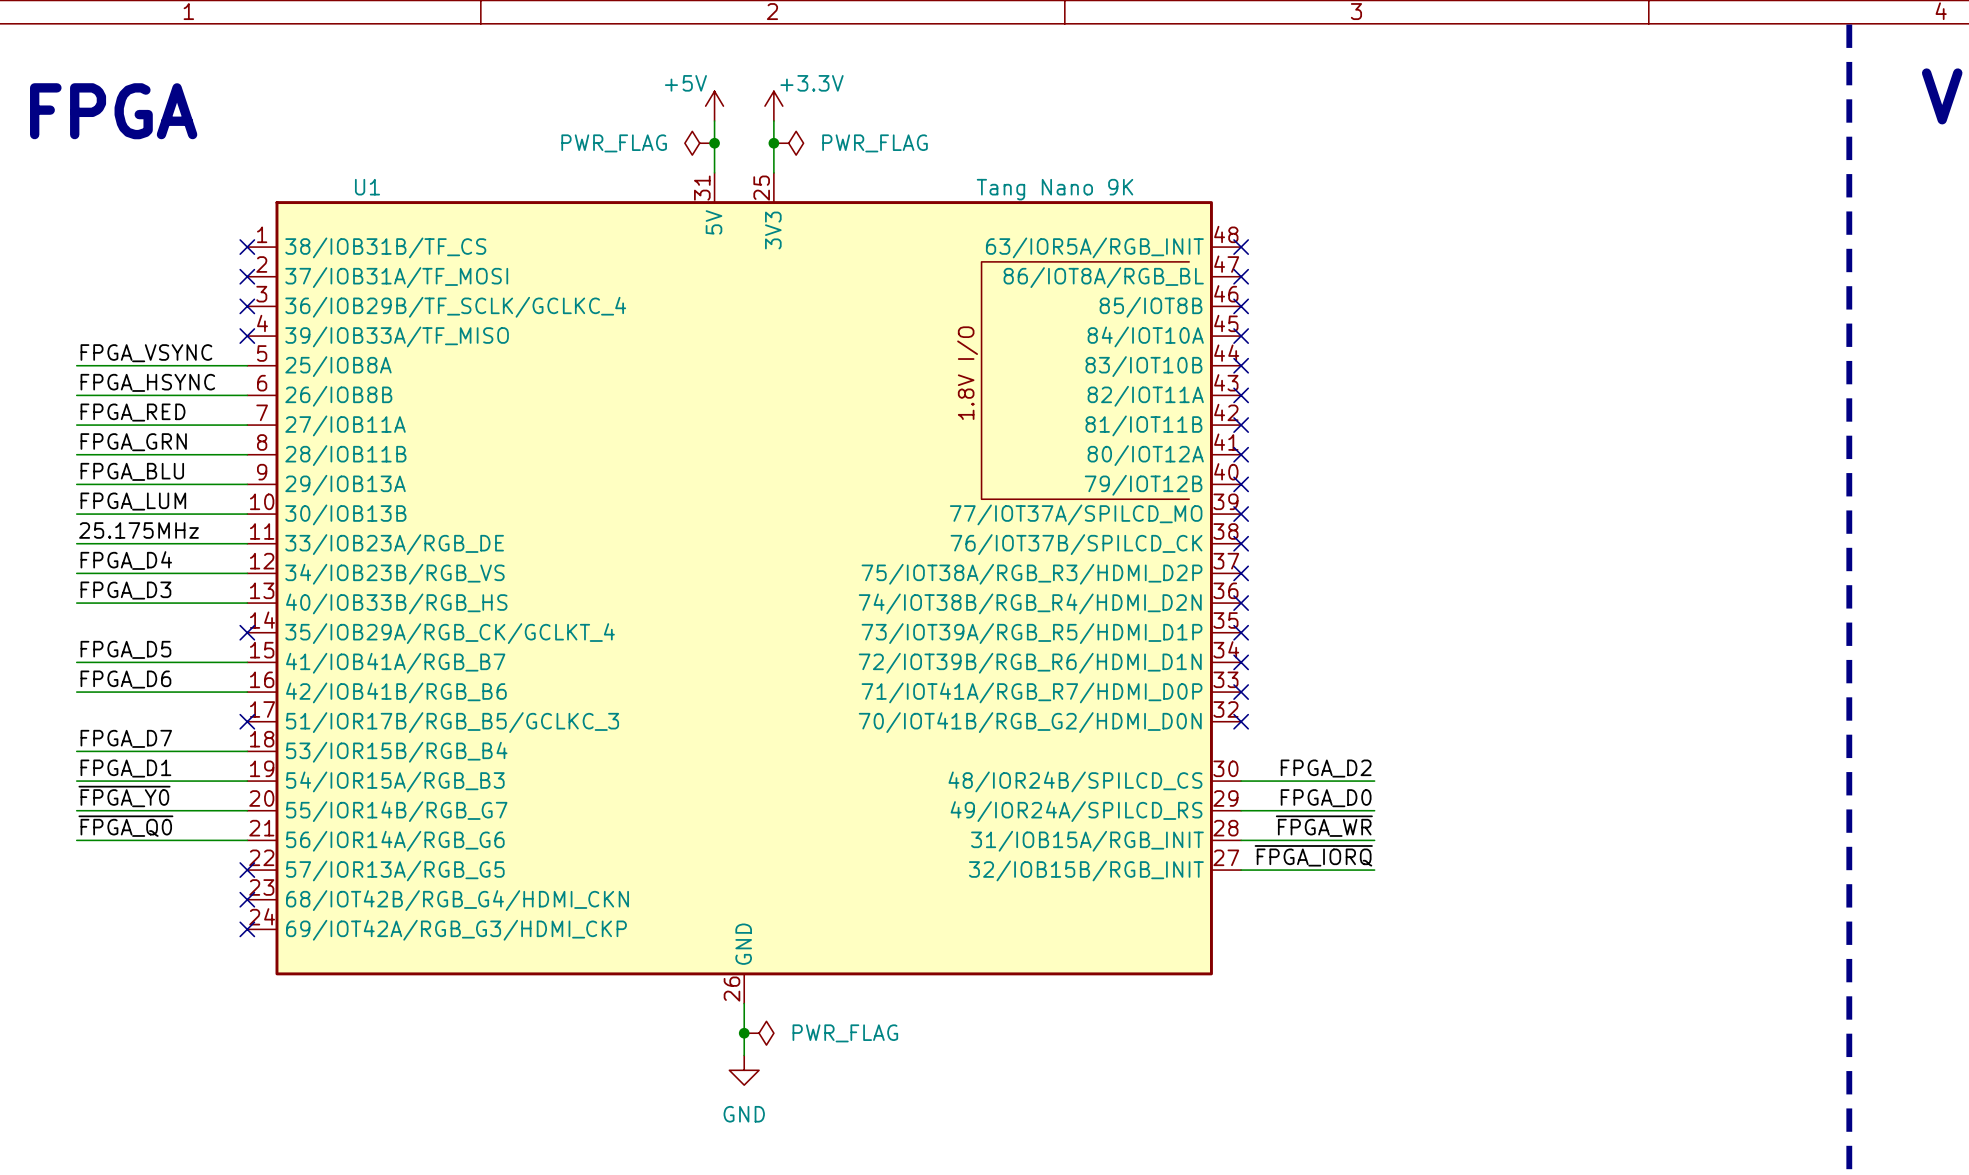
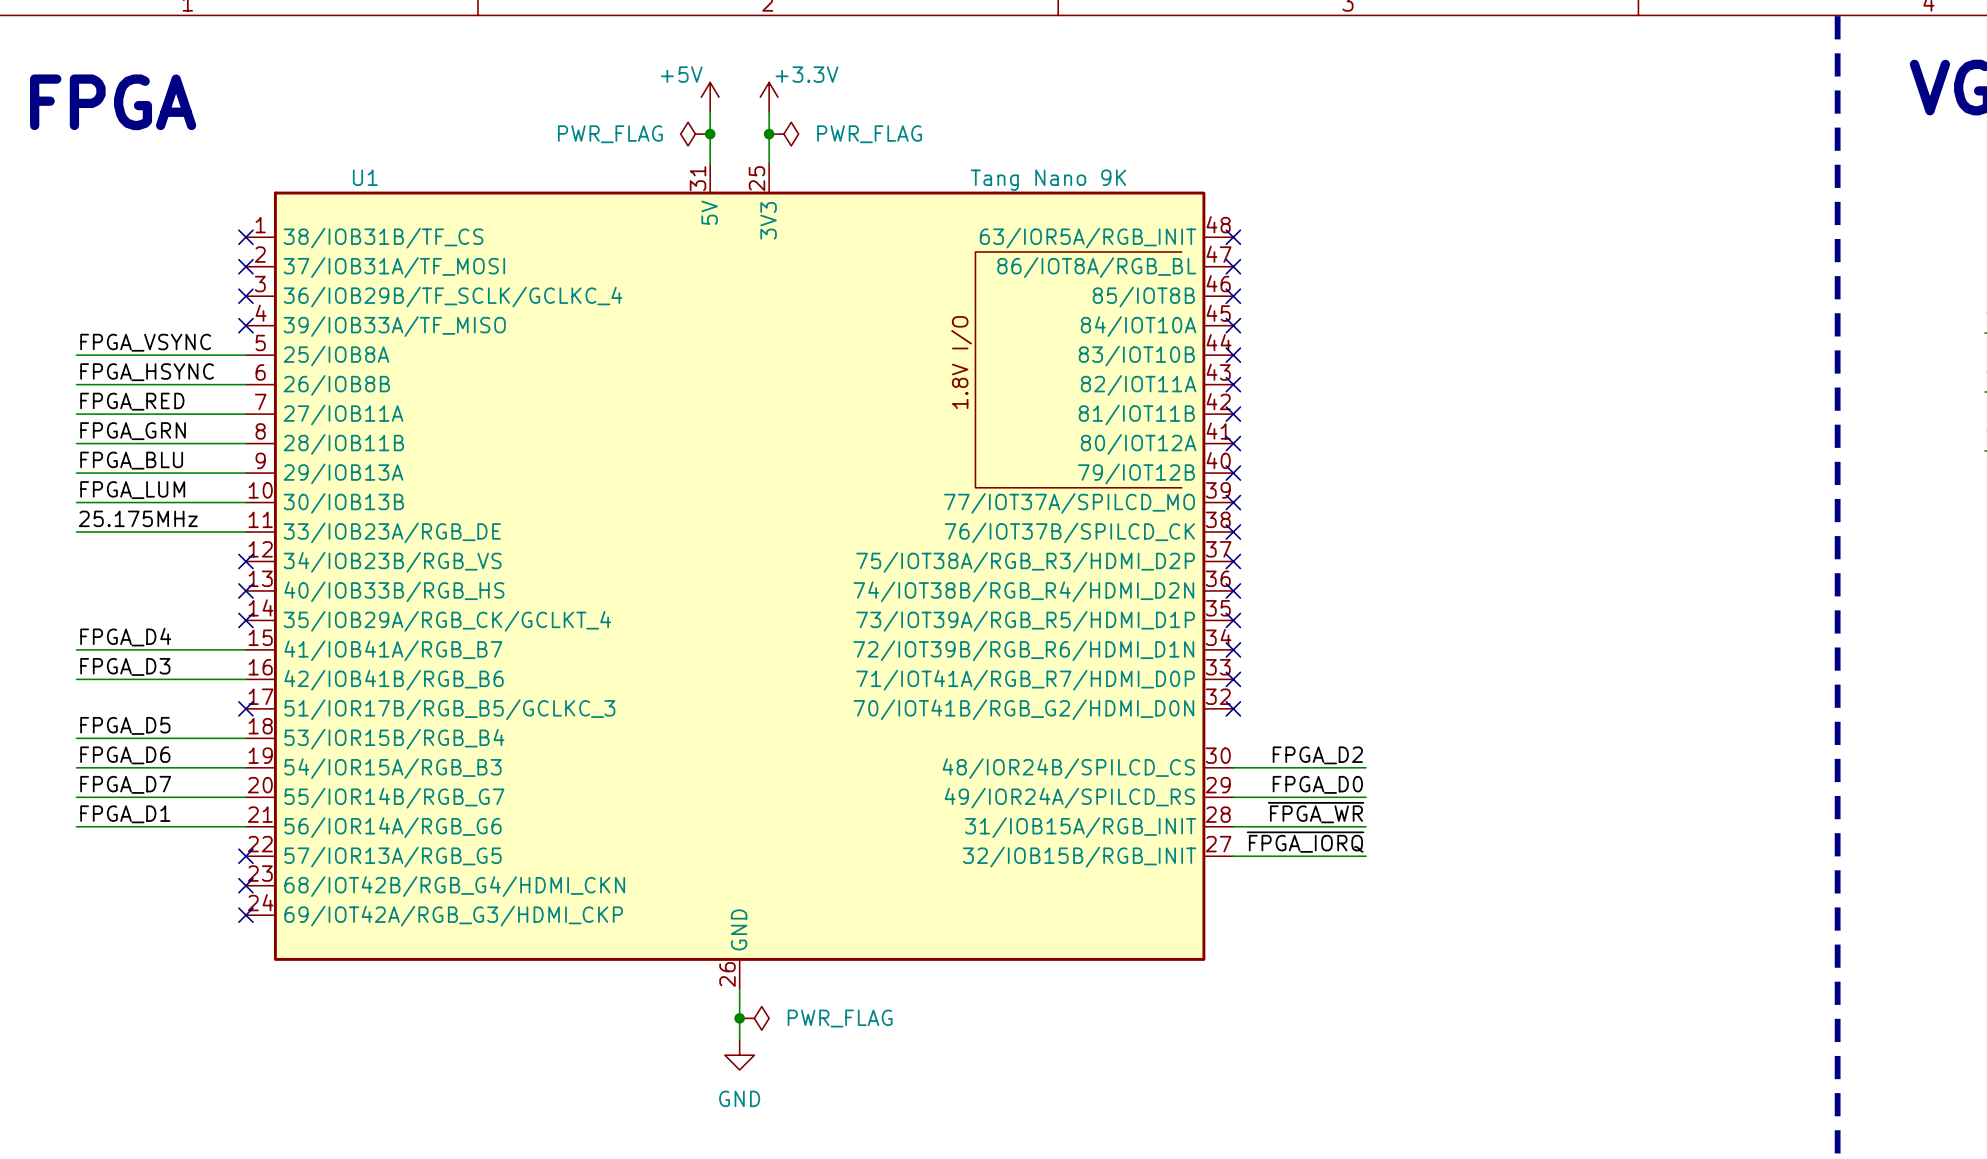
label: FPGA_D4 (126, 560) -> none
wire: (76, 573) (247, 573) -> none
no-connect mark: none -> (245, 561)
label: FPGA_D3 (125, 590) -> none
wire: (76, 603) (247, 603) -> none
no-connect mark: none -> (245, 590)
label: FPGA_D5 (125, 649) -> FPGA_D4 (125, 637)
label: FPGA_D6 (125, 679) -> FPGA_D3 (125, 666)
label: FPGA_D7 (126, 738) -> FPGA_D5 (125, 725)
label: FPGA_D1 (125, 768) -> FPGA_D6 (125, 755)
label: ~{FPGA_Y0} (124, 796) -> FPGA_D7 (125, 784)
label: ~{FPGA_Q0} (125, 826) -> FPGA_D1 (125, 814)

